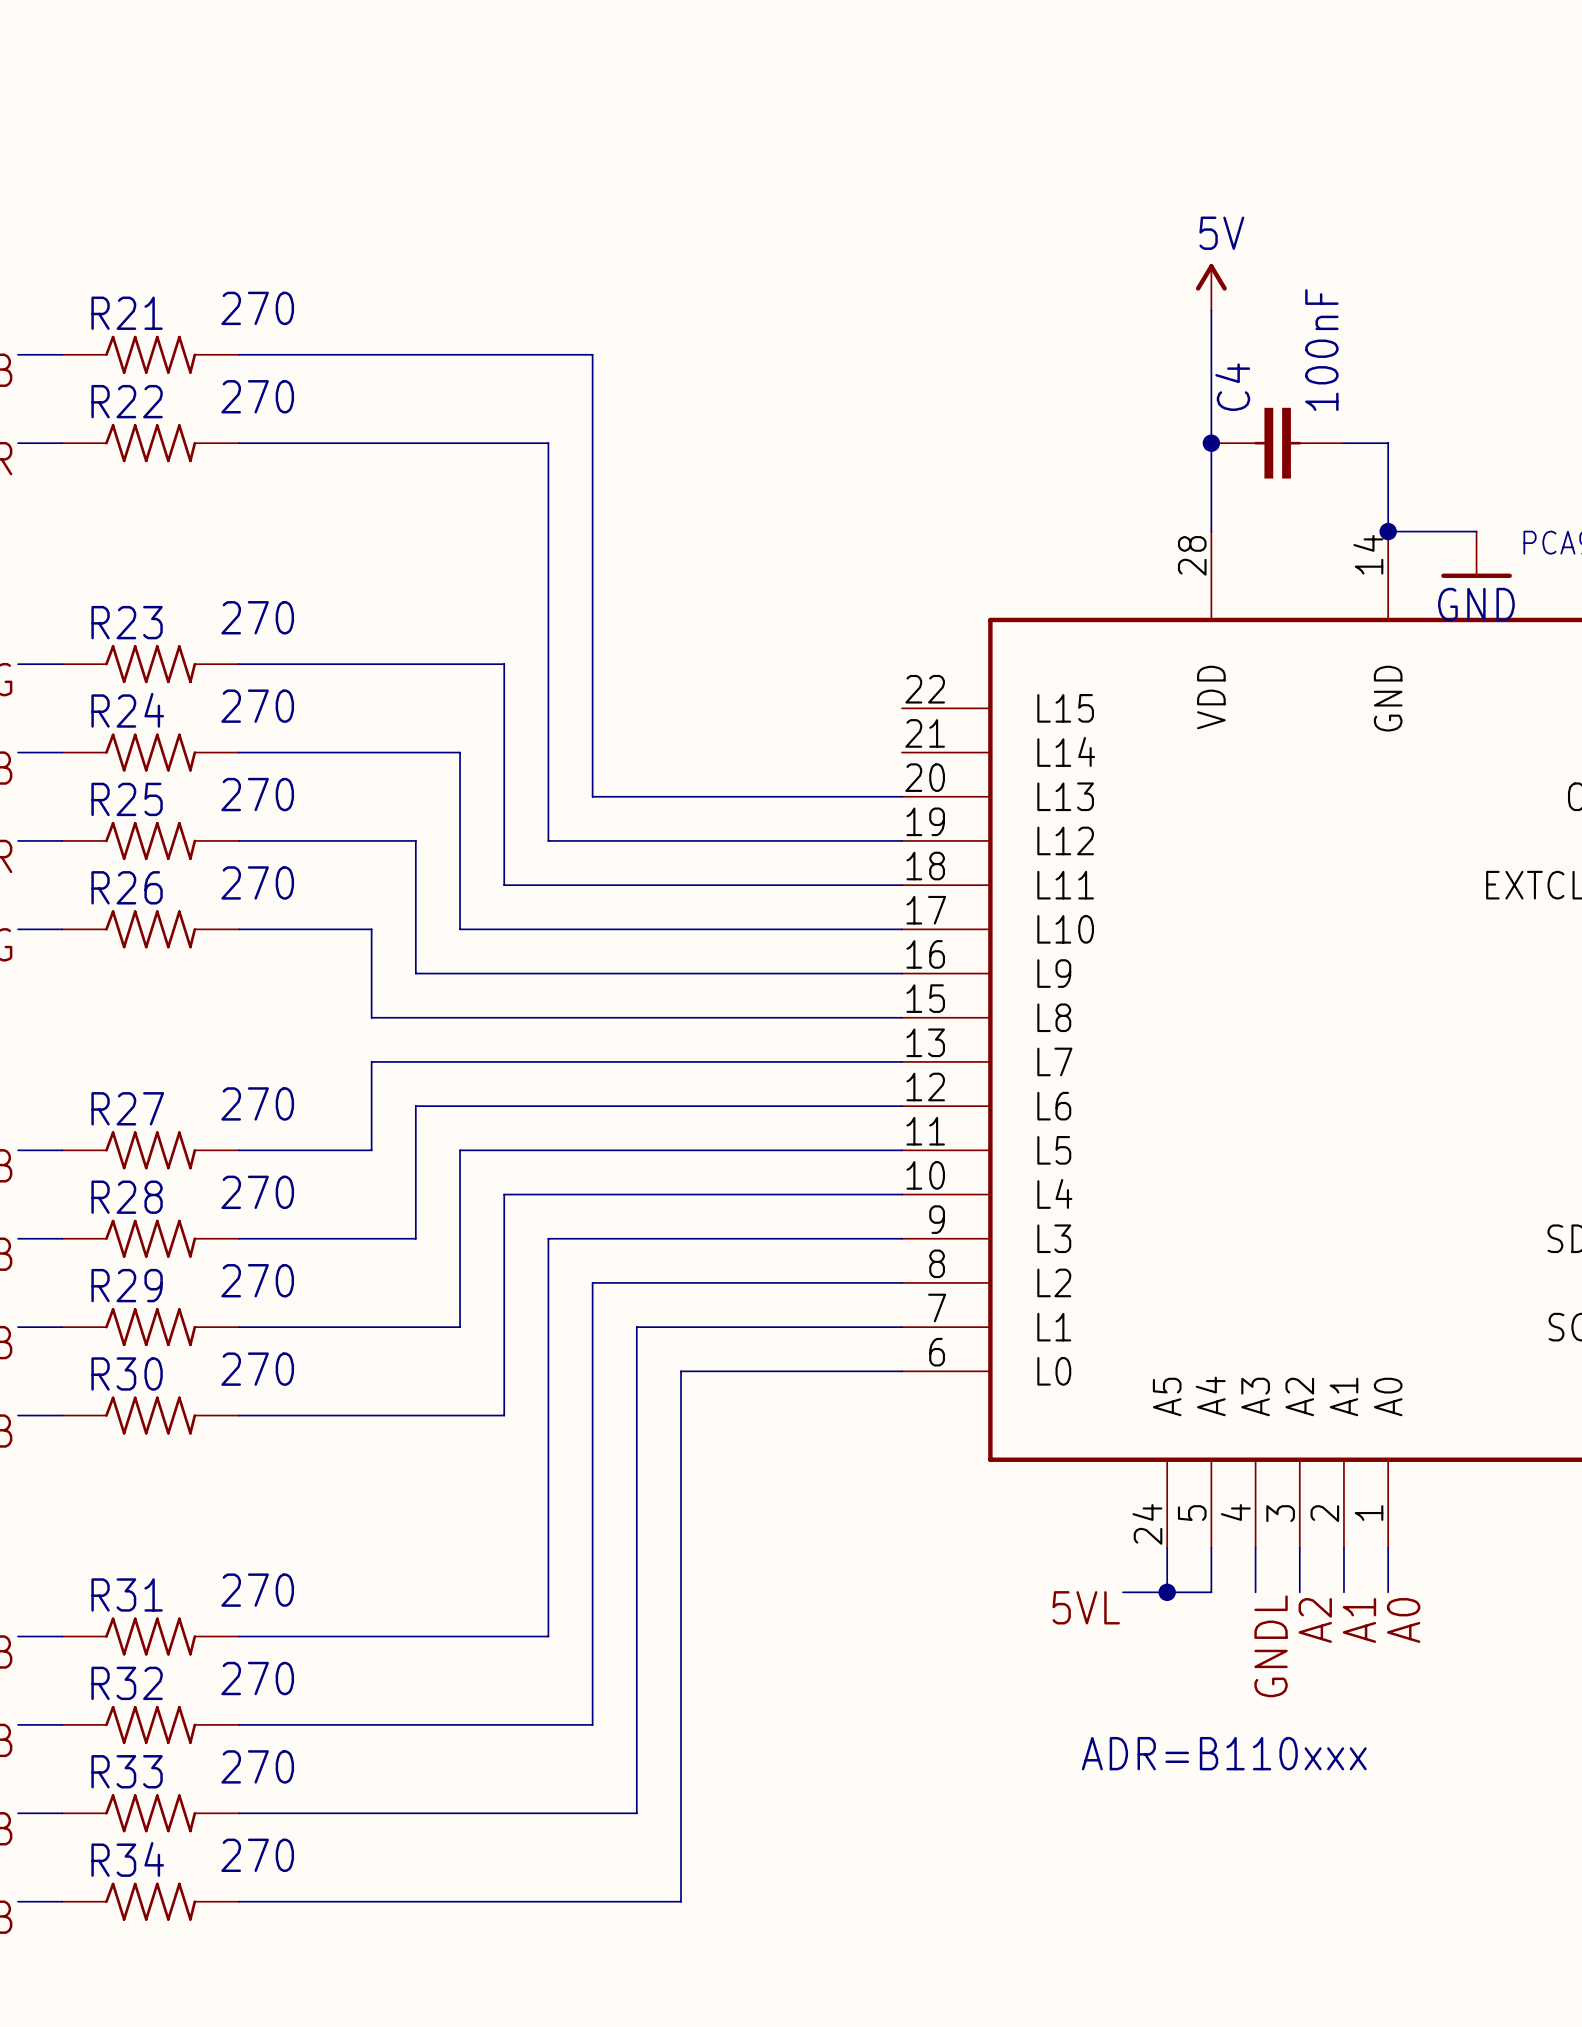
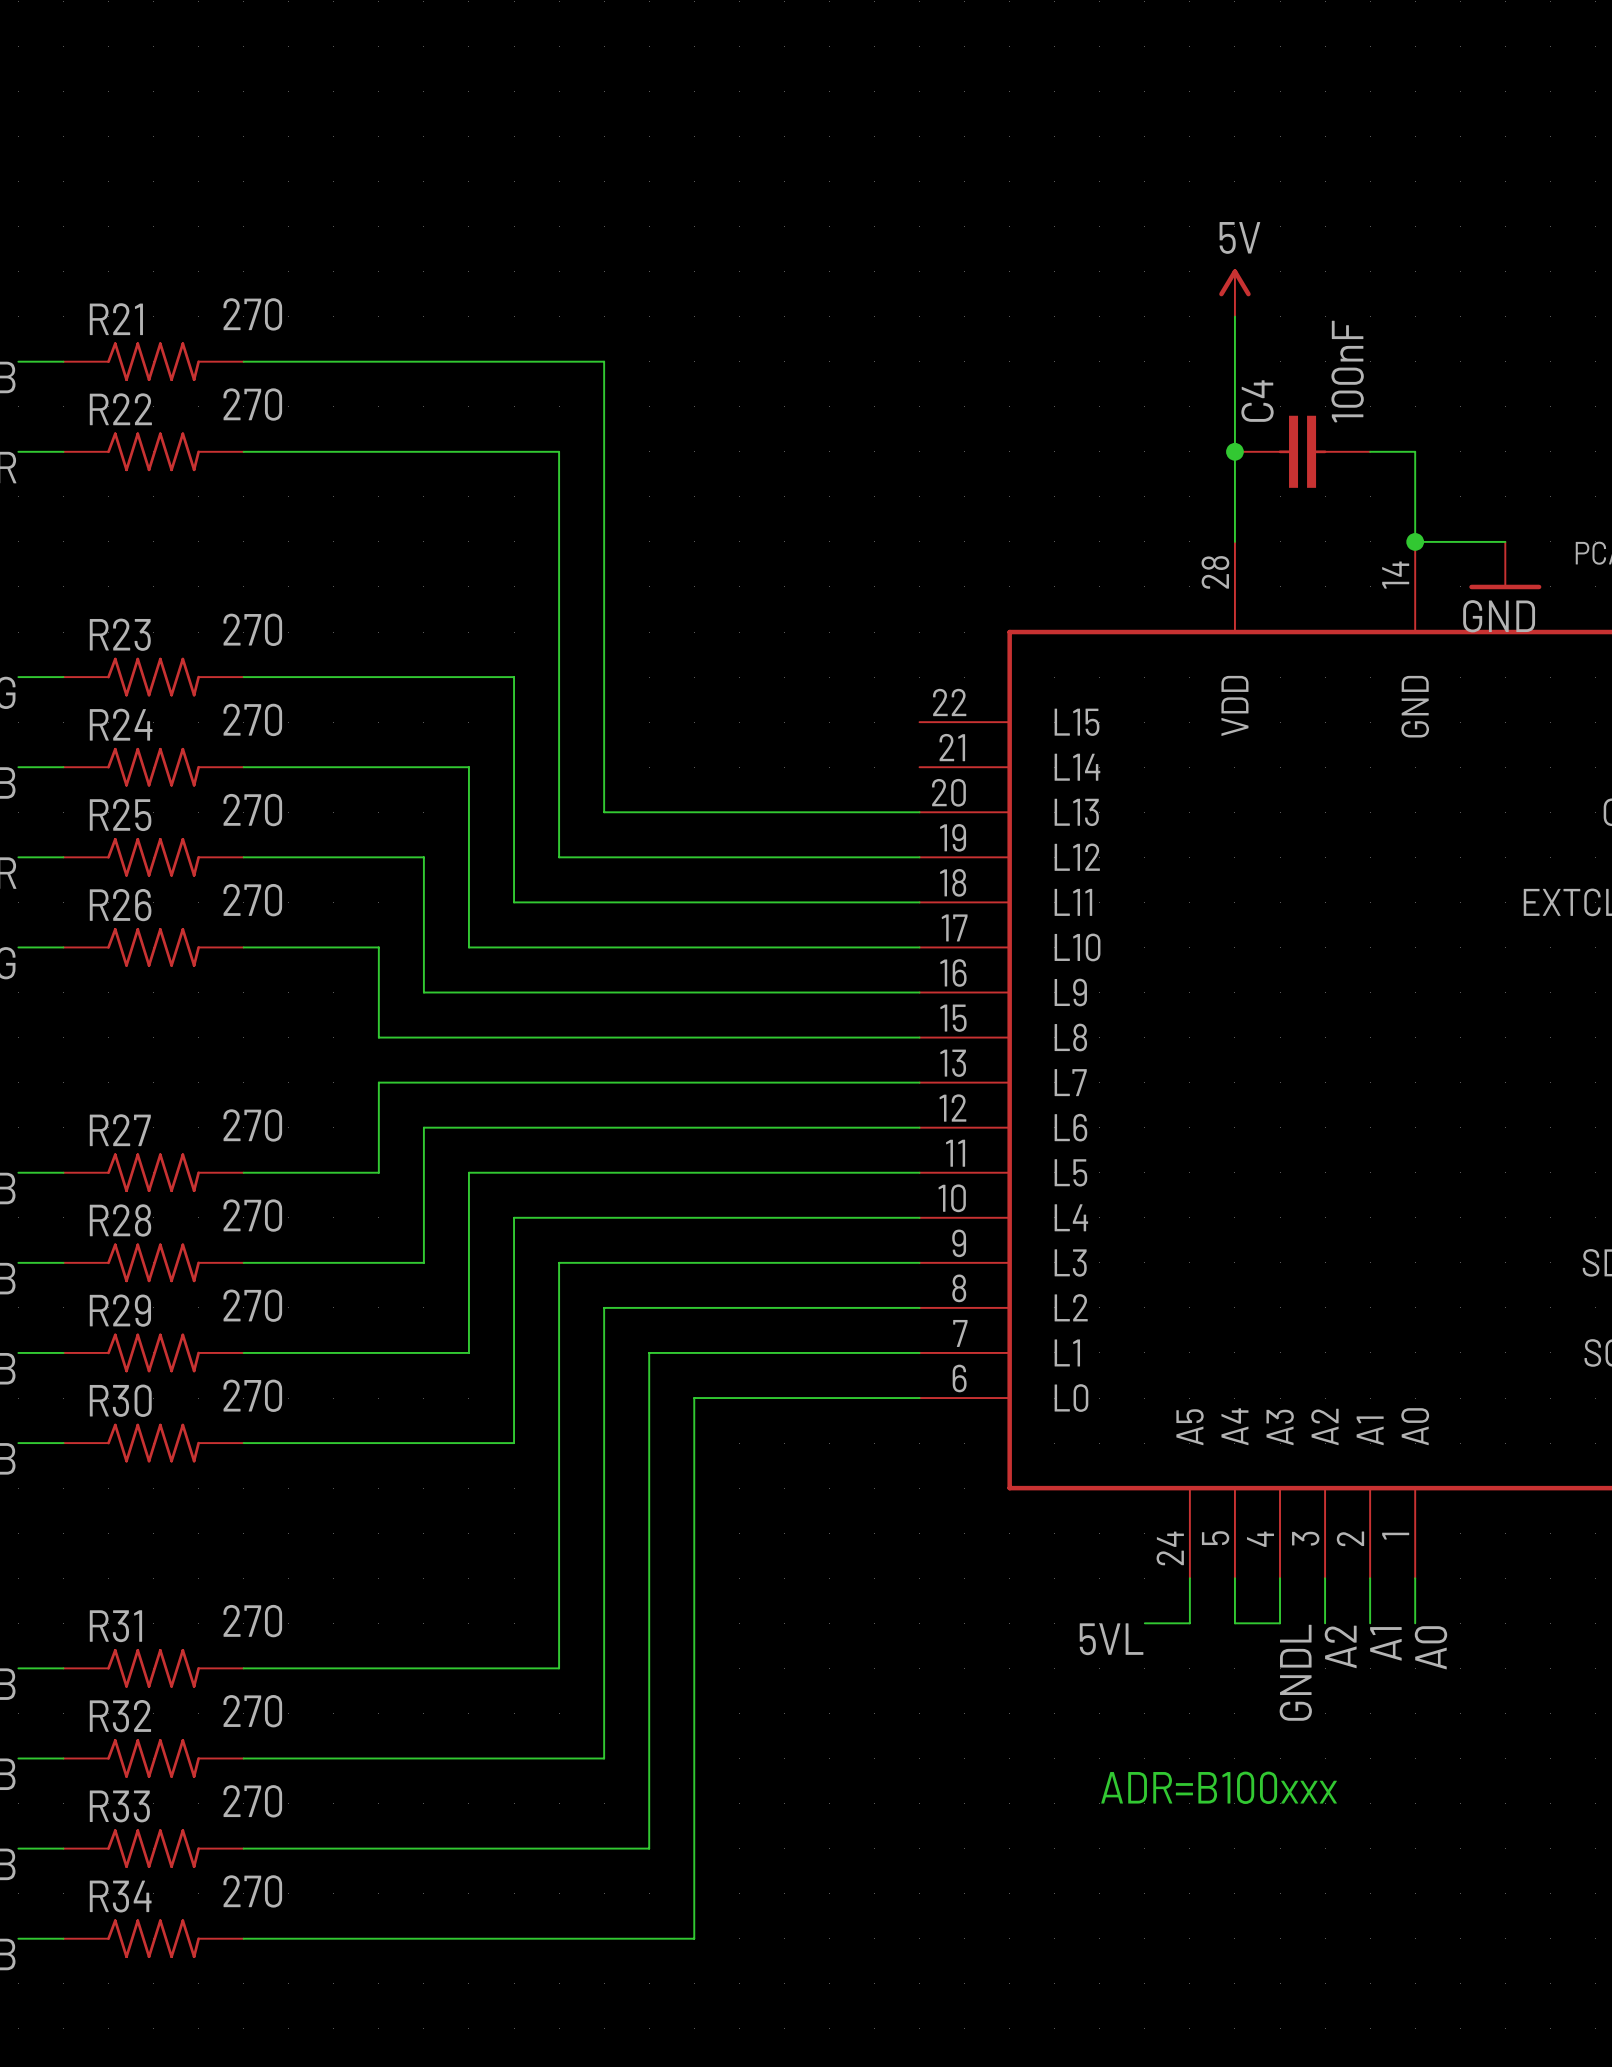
wire: (1167, 1592) (1211, 1592) -> (1280, 1623) (1234, 1623)
junction: (1167, 1592) -> none
text: ADR=B110xxx (1224, 1753) -> ADR=B100xxx (1219, 1787)

